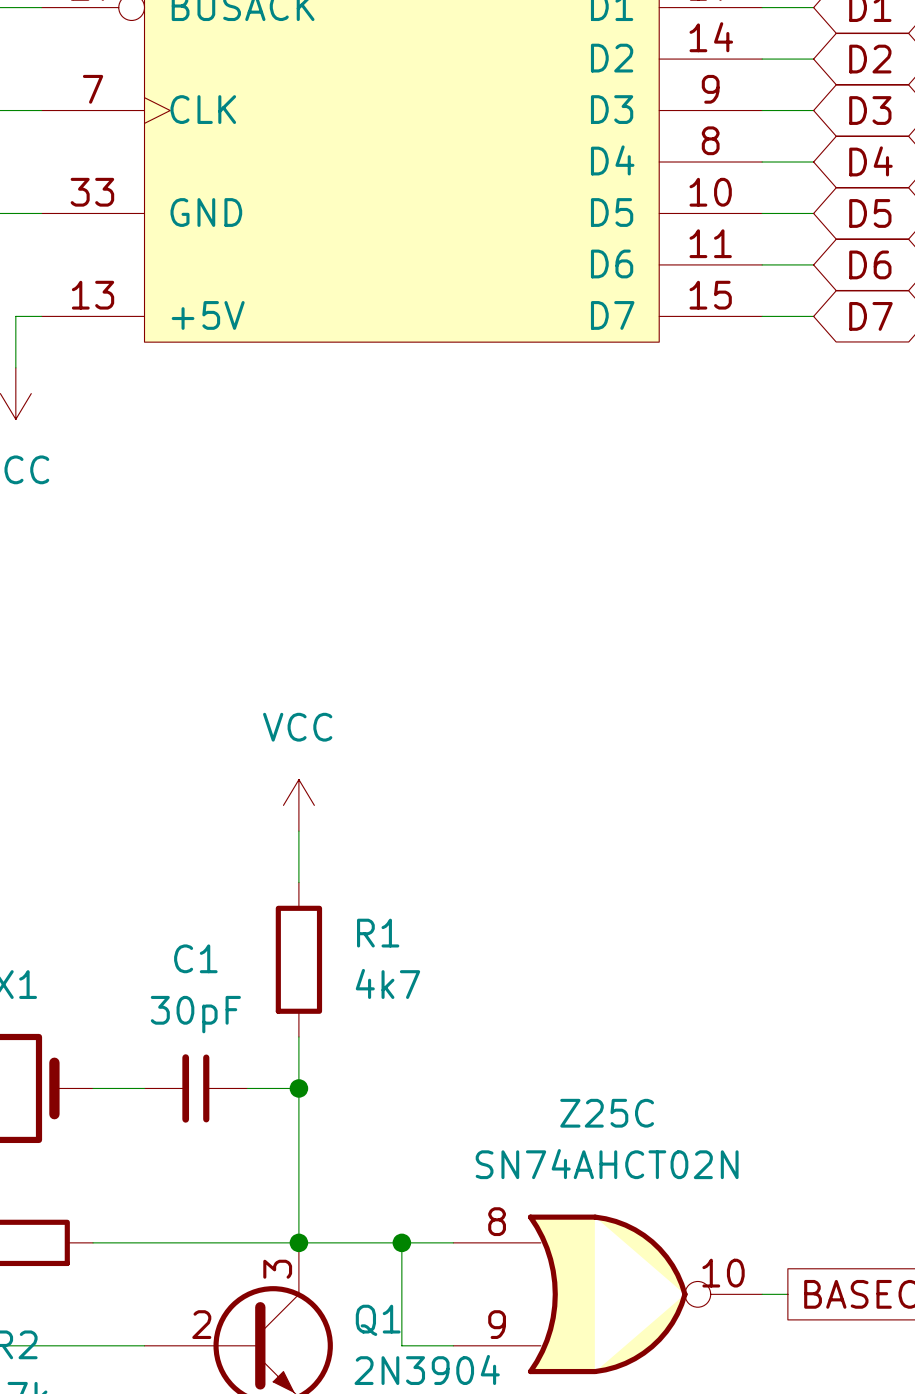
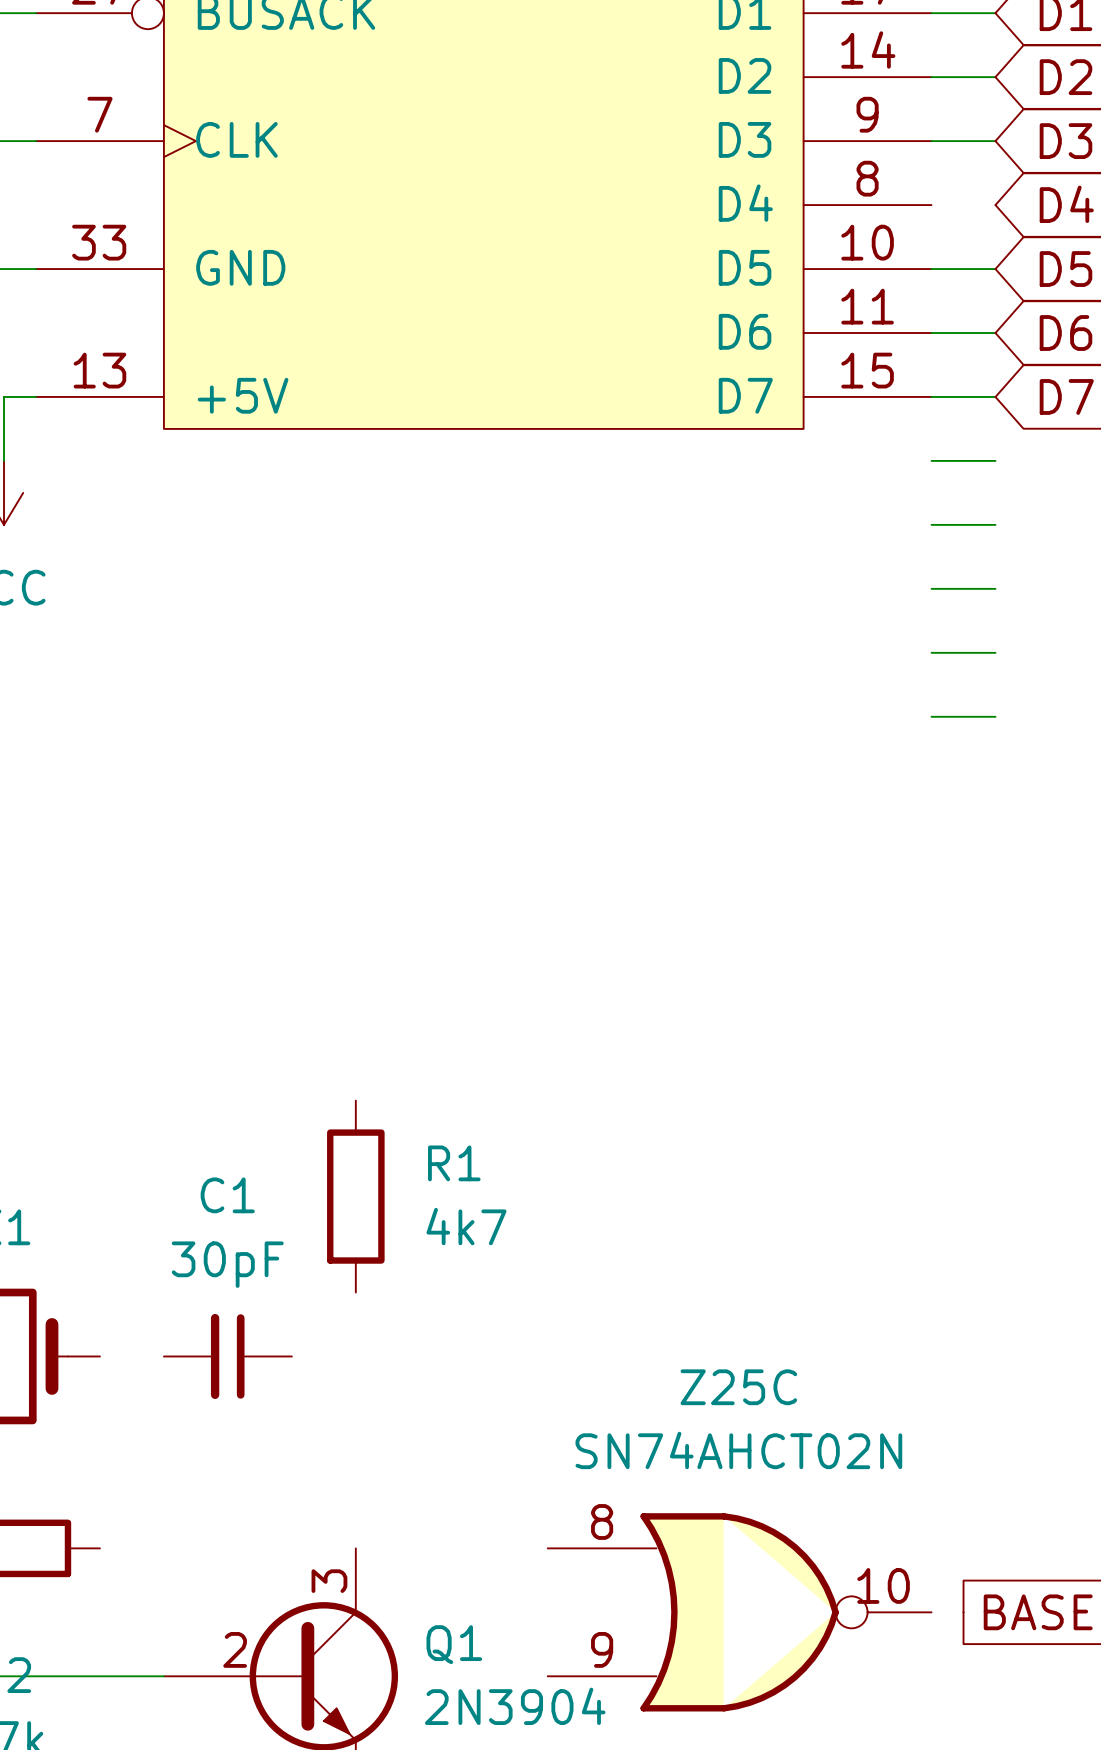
wire: (762, 162) (813, 162) -> (931, 524) (995, 524)
wire: none -> (931, 460) (995, 460)
wire: none -> (931, 588) (995, 588)
wire: none -> (931, 652) (995, 652)
wire: none -> (931, 716) (995, 716)
power symbol: VCC (298, 805) -> none
wire: (298, 831) (298, 882) -> none
wire: (298, 1036) (298, 1242) -> none
wire: (93, 1088) (144, 1088) -> none
wire: (247, 1088) (298, 1088) -> none
junction: (298, 1088) -> none
wire: (93, 1242) (453, 1242) -> none
junction: (298, 1242) -> none
wire: (401, 1242) (401, 1345) (453, 1345) -> none
junction: (401, 1242) -> none
wire: (762, 1294) (787, 1294) -> none

